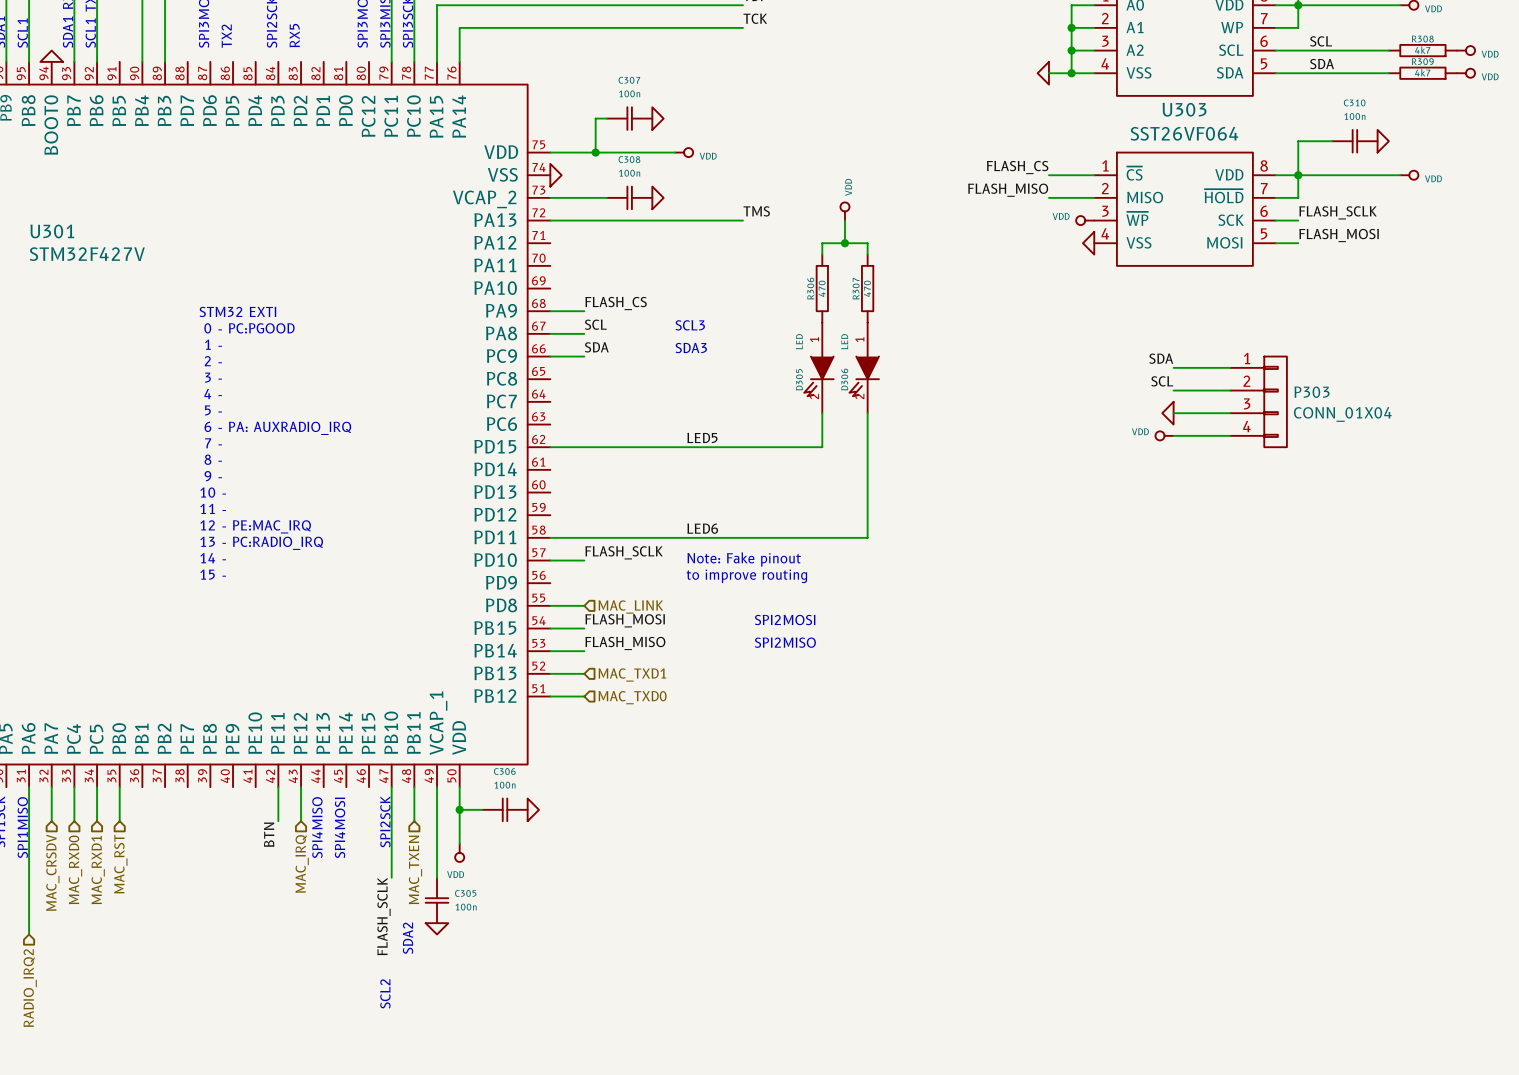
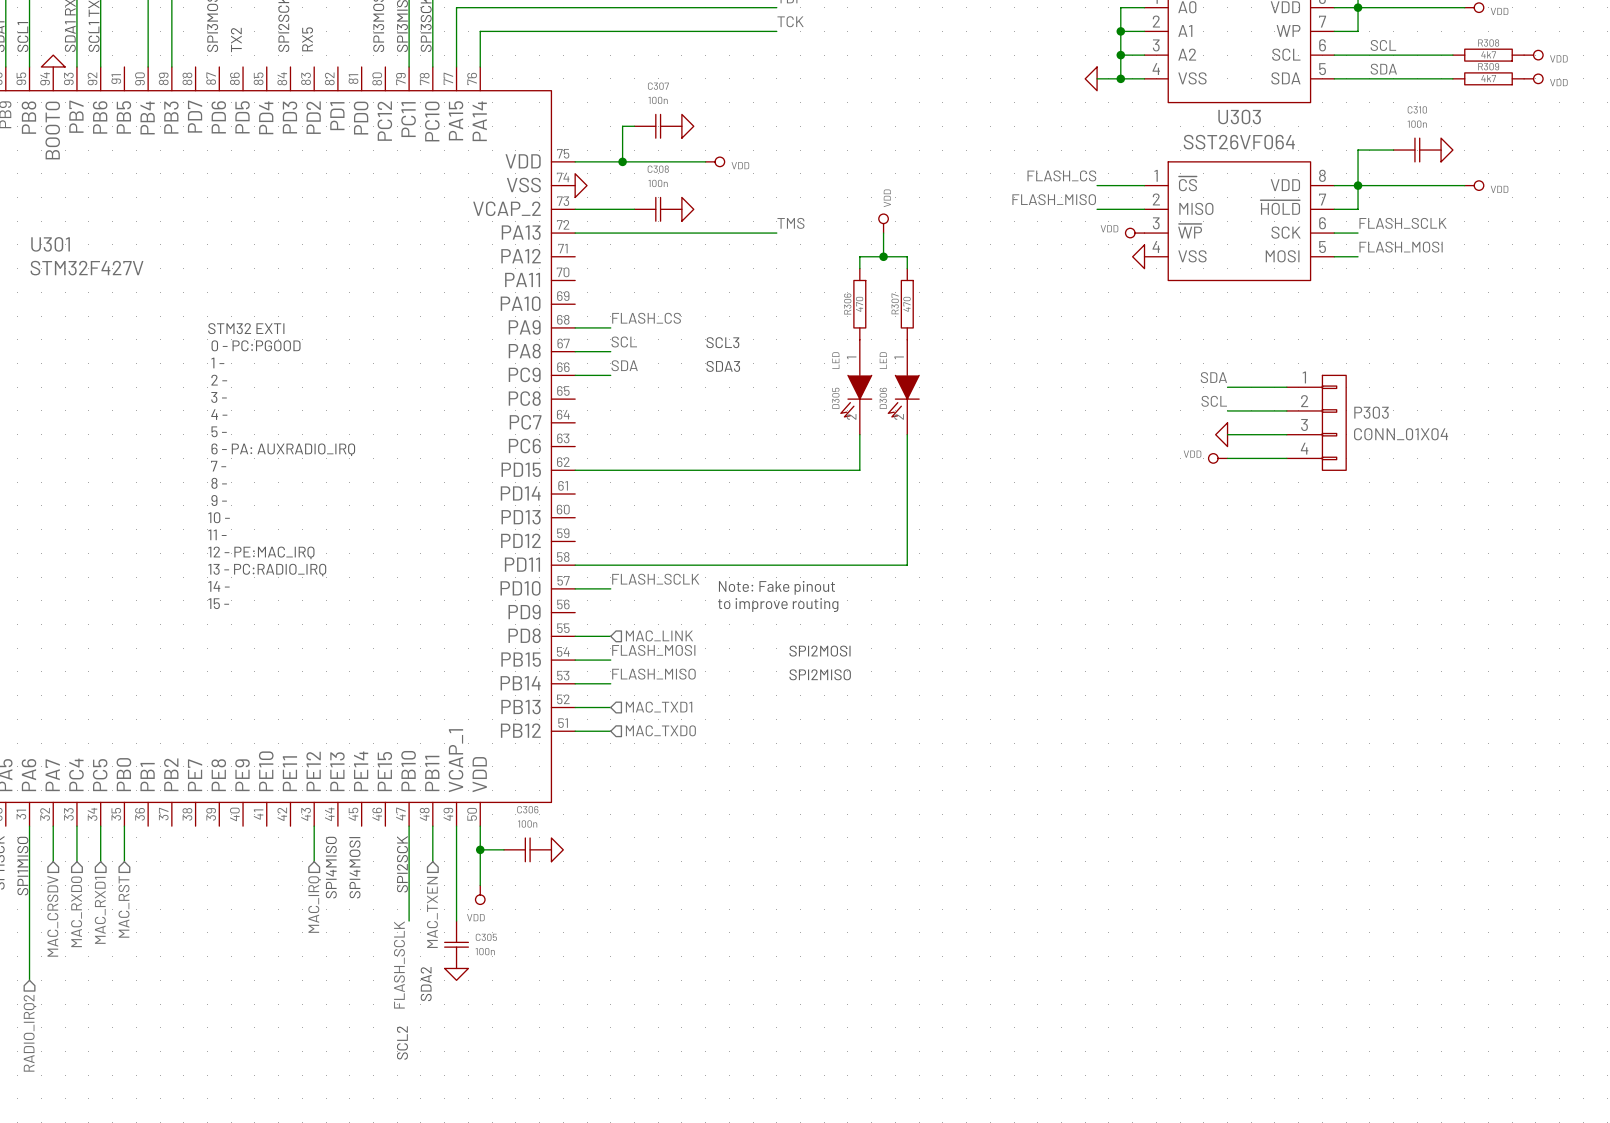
label: LED5 (702, 437) -> none
label: LED6 (702, 528) -> none
wire: (278, 787) (278, 821) -> none
label: BTN (269, 834) -> none

